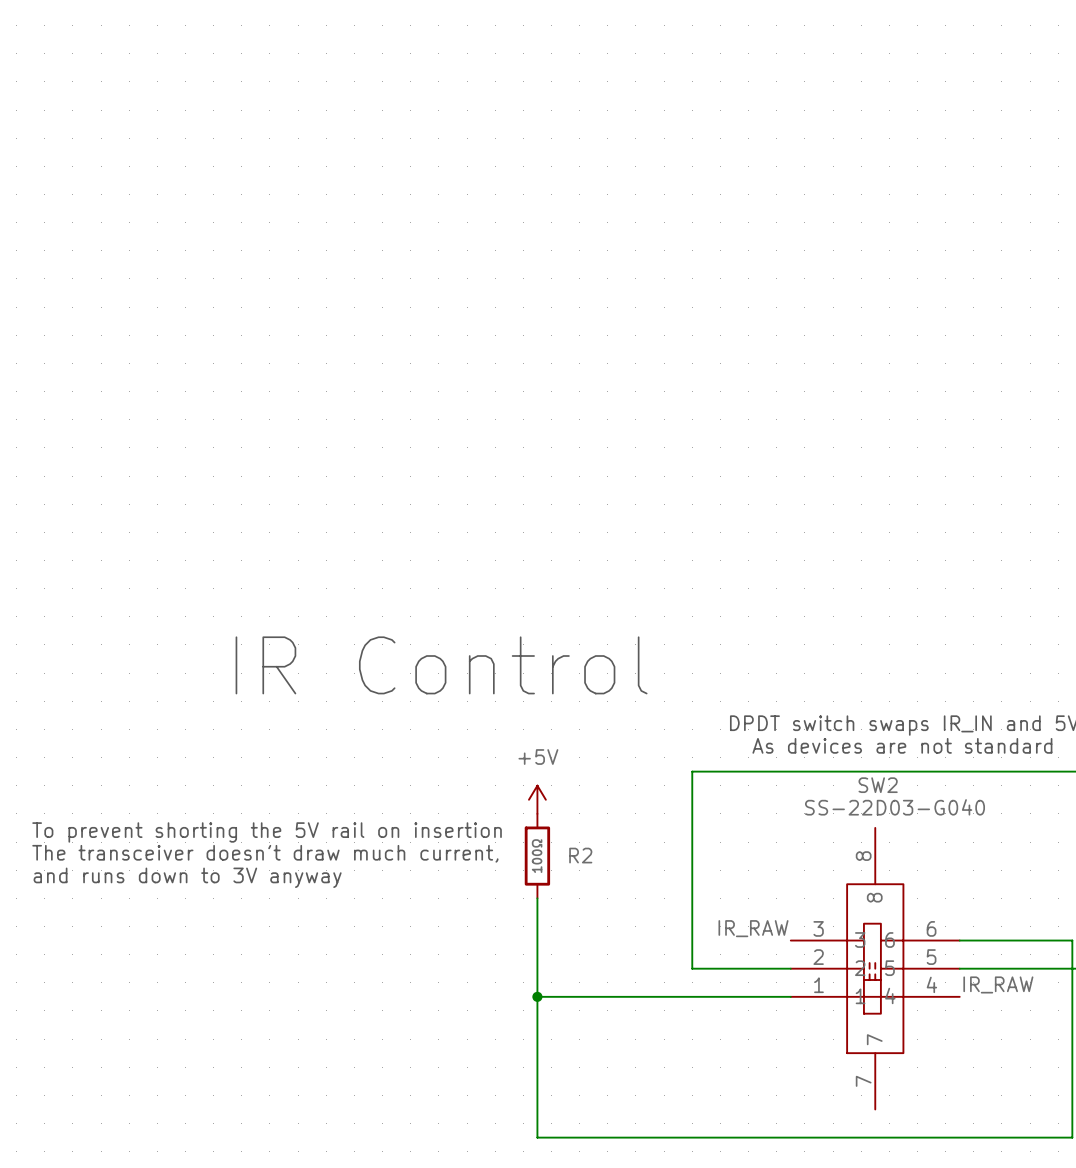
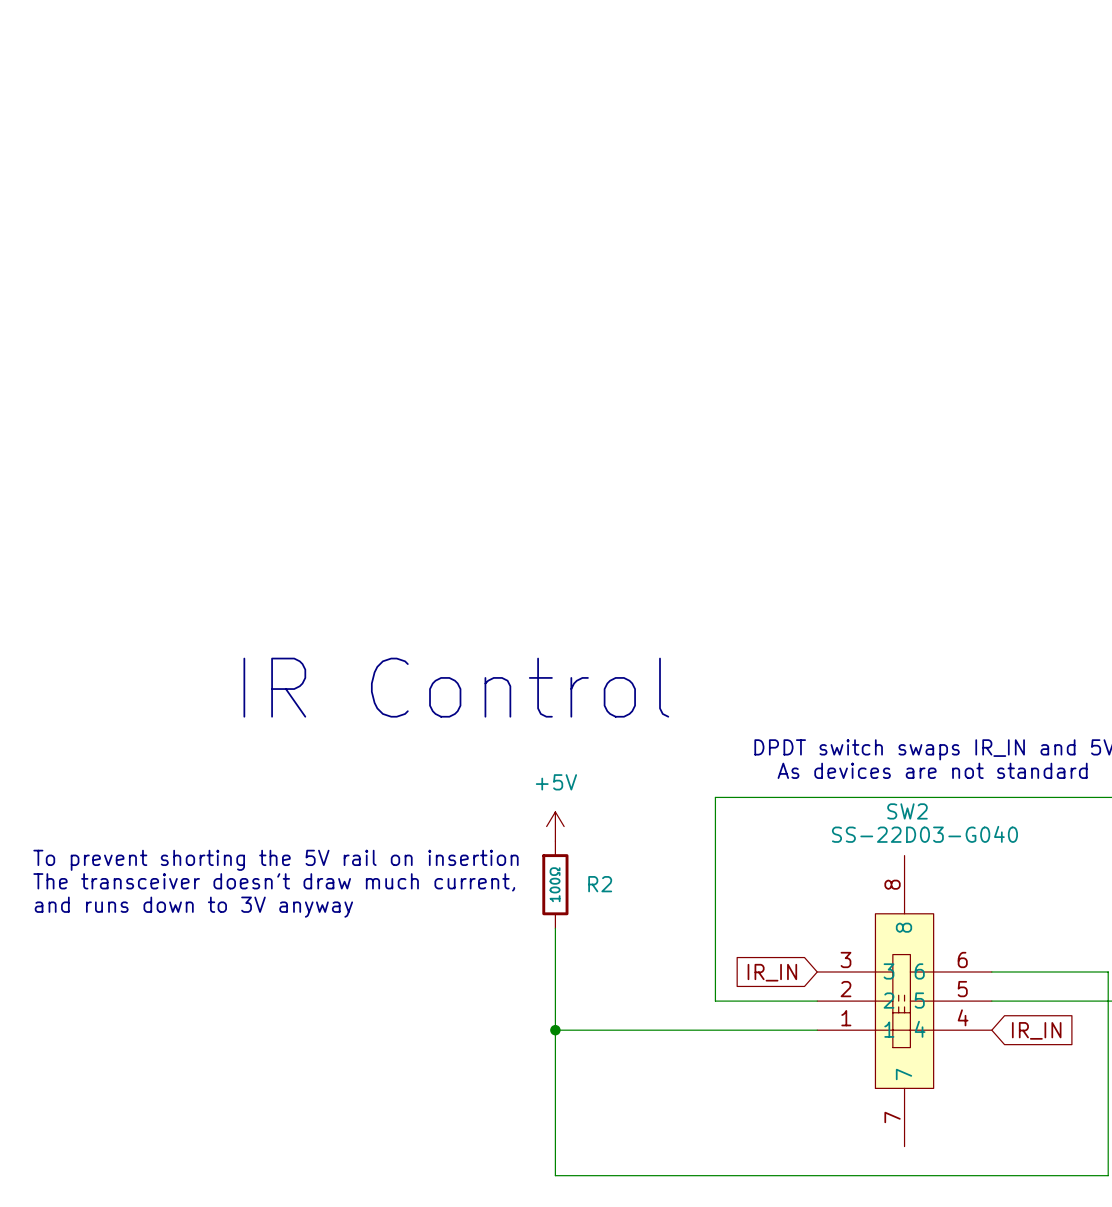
label: IR_RAW (753, 928) -> none
global label: none -> IR_IN (772, 972)
label: IR_RAW (998, 984) -> none
global label: none -> IR_IN (1036, 1030)

